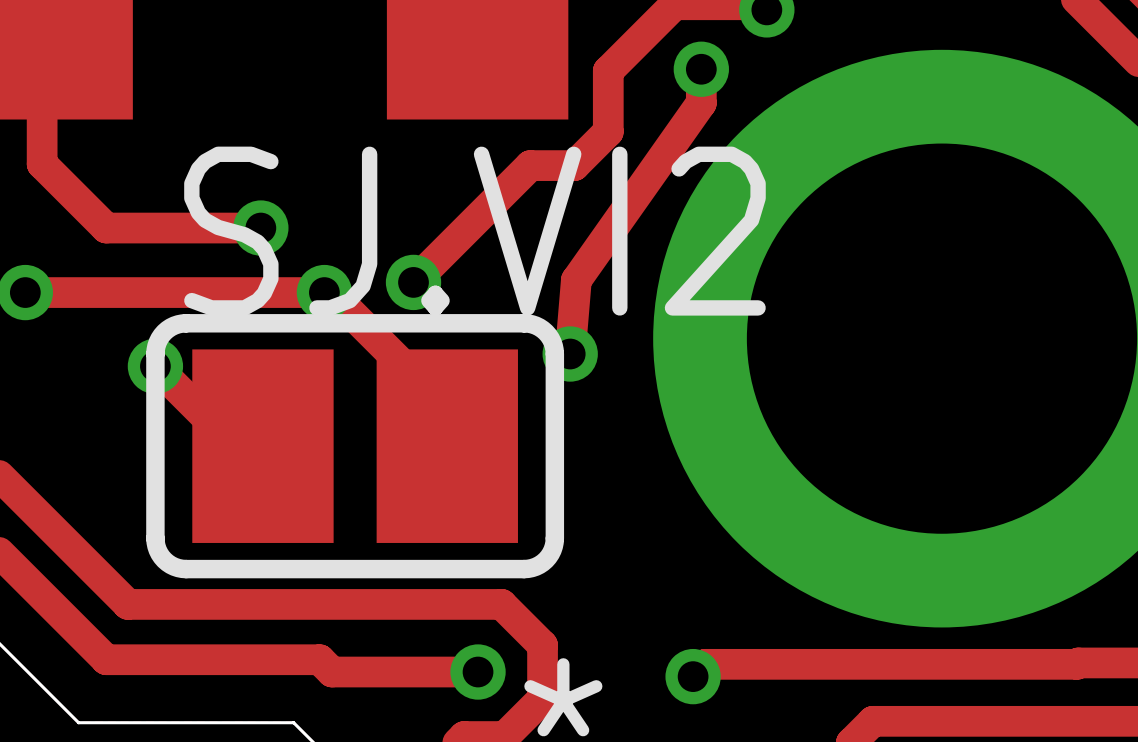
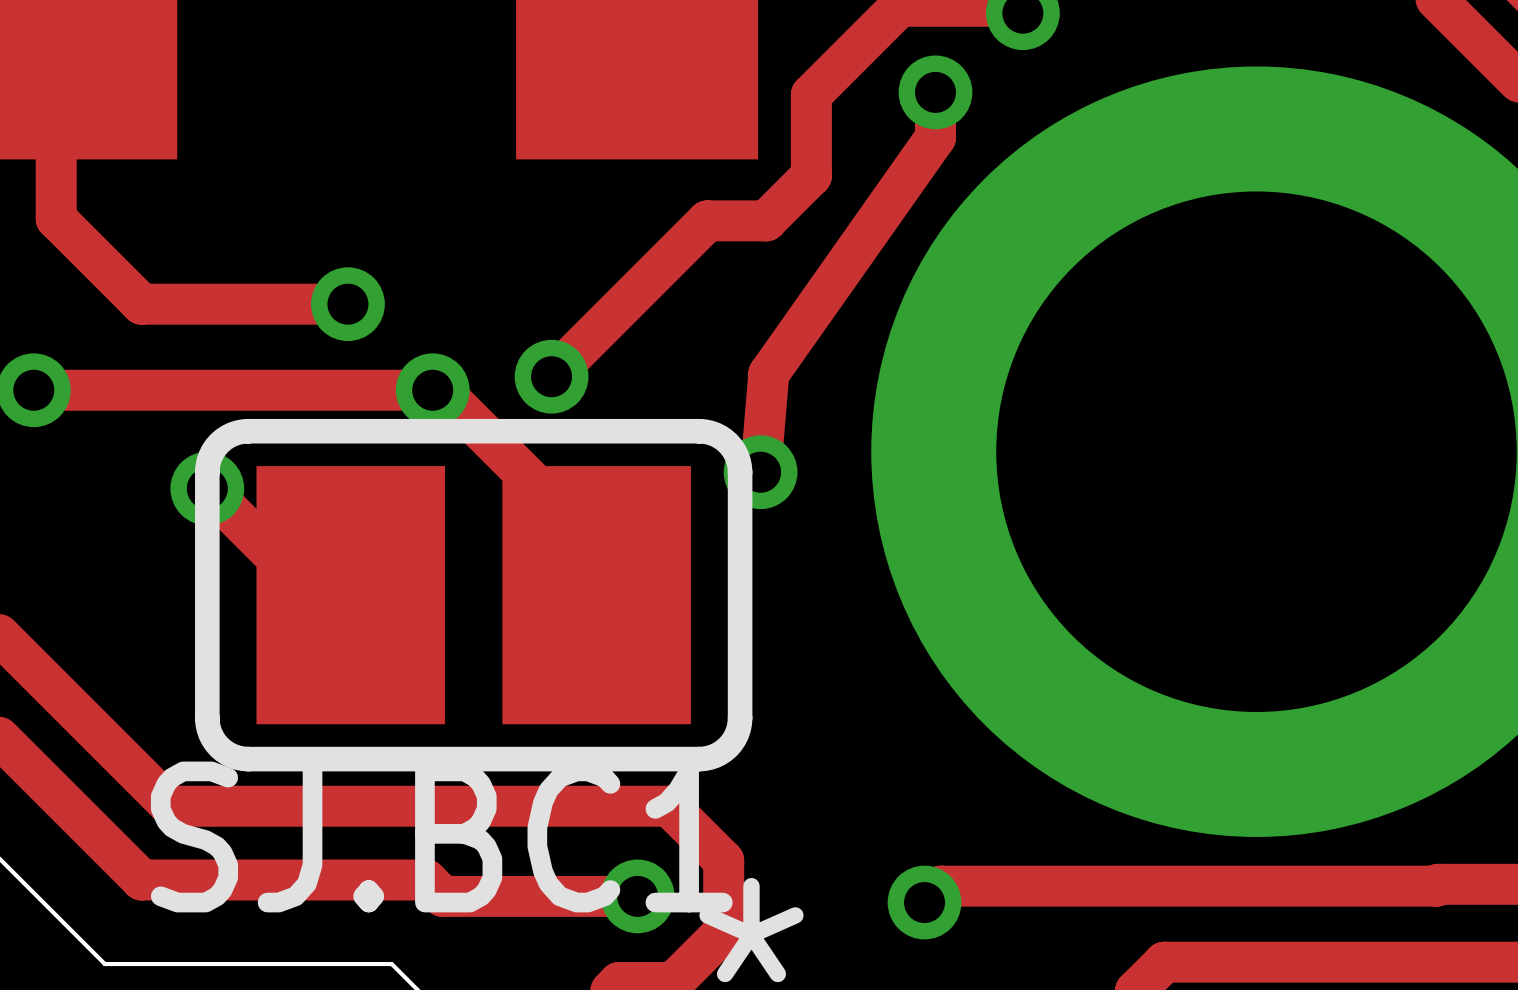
SJ.VI2 name: SJ.VI2 (474, 231) -> SJ.BC1 (441, 836)

